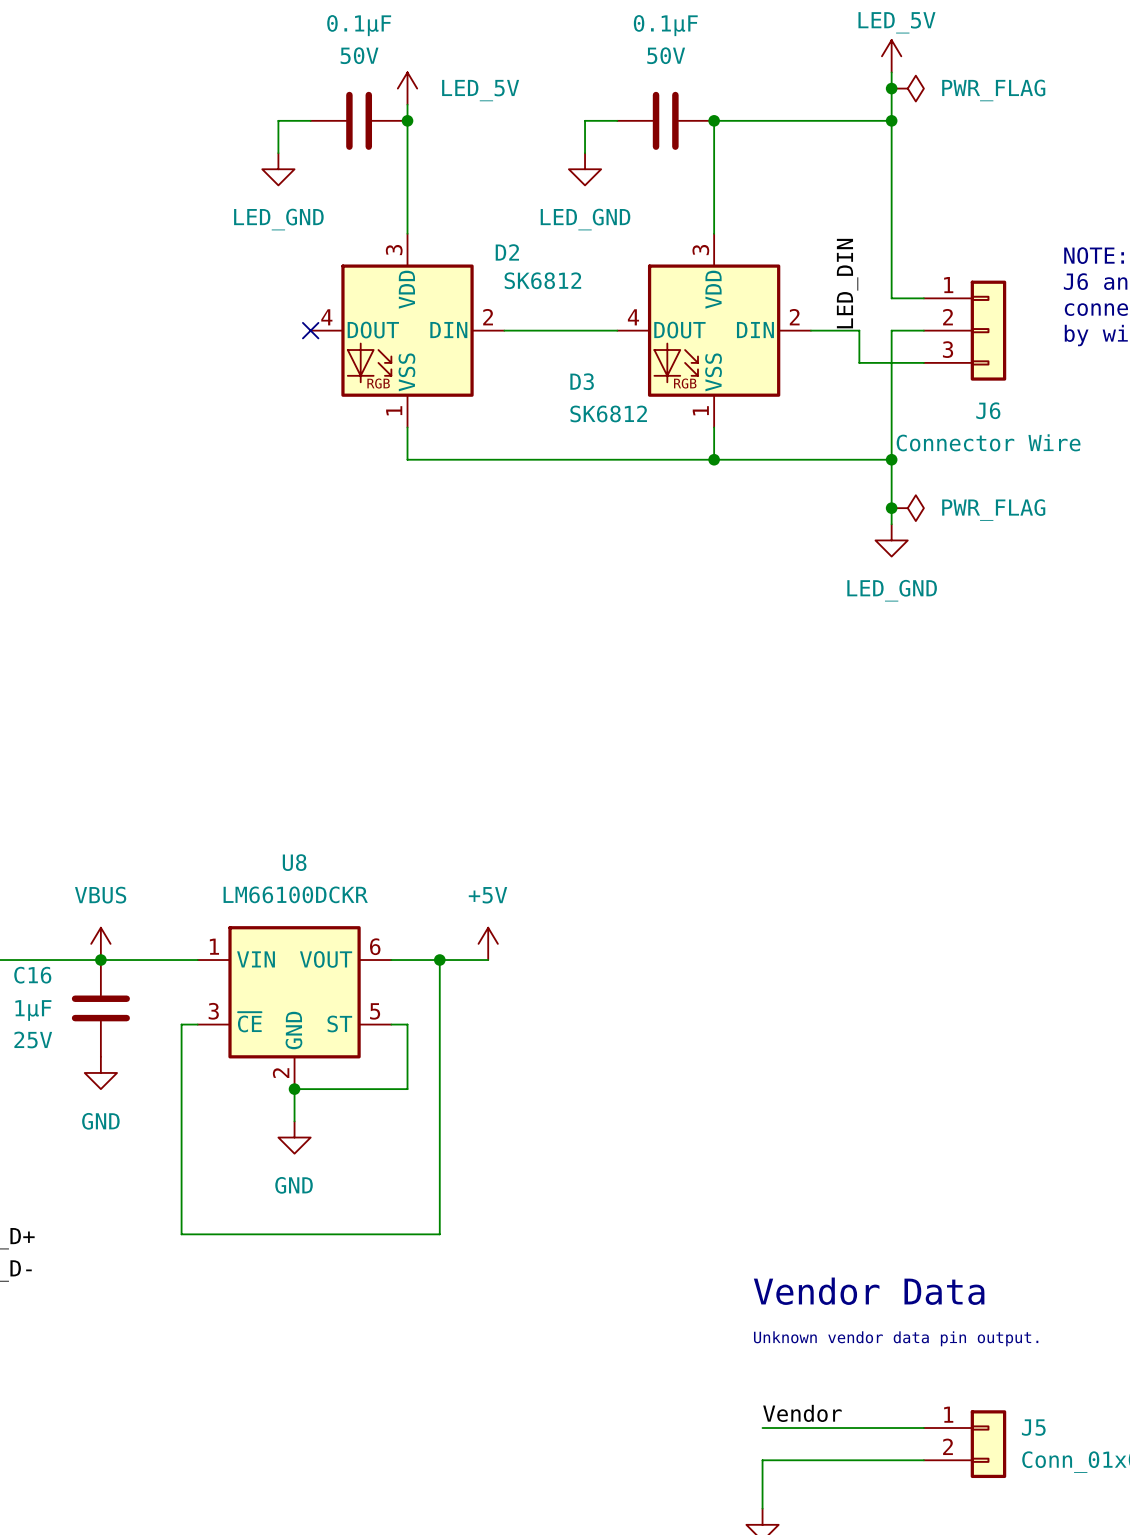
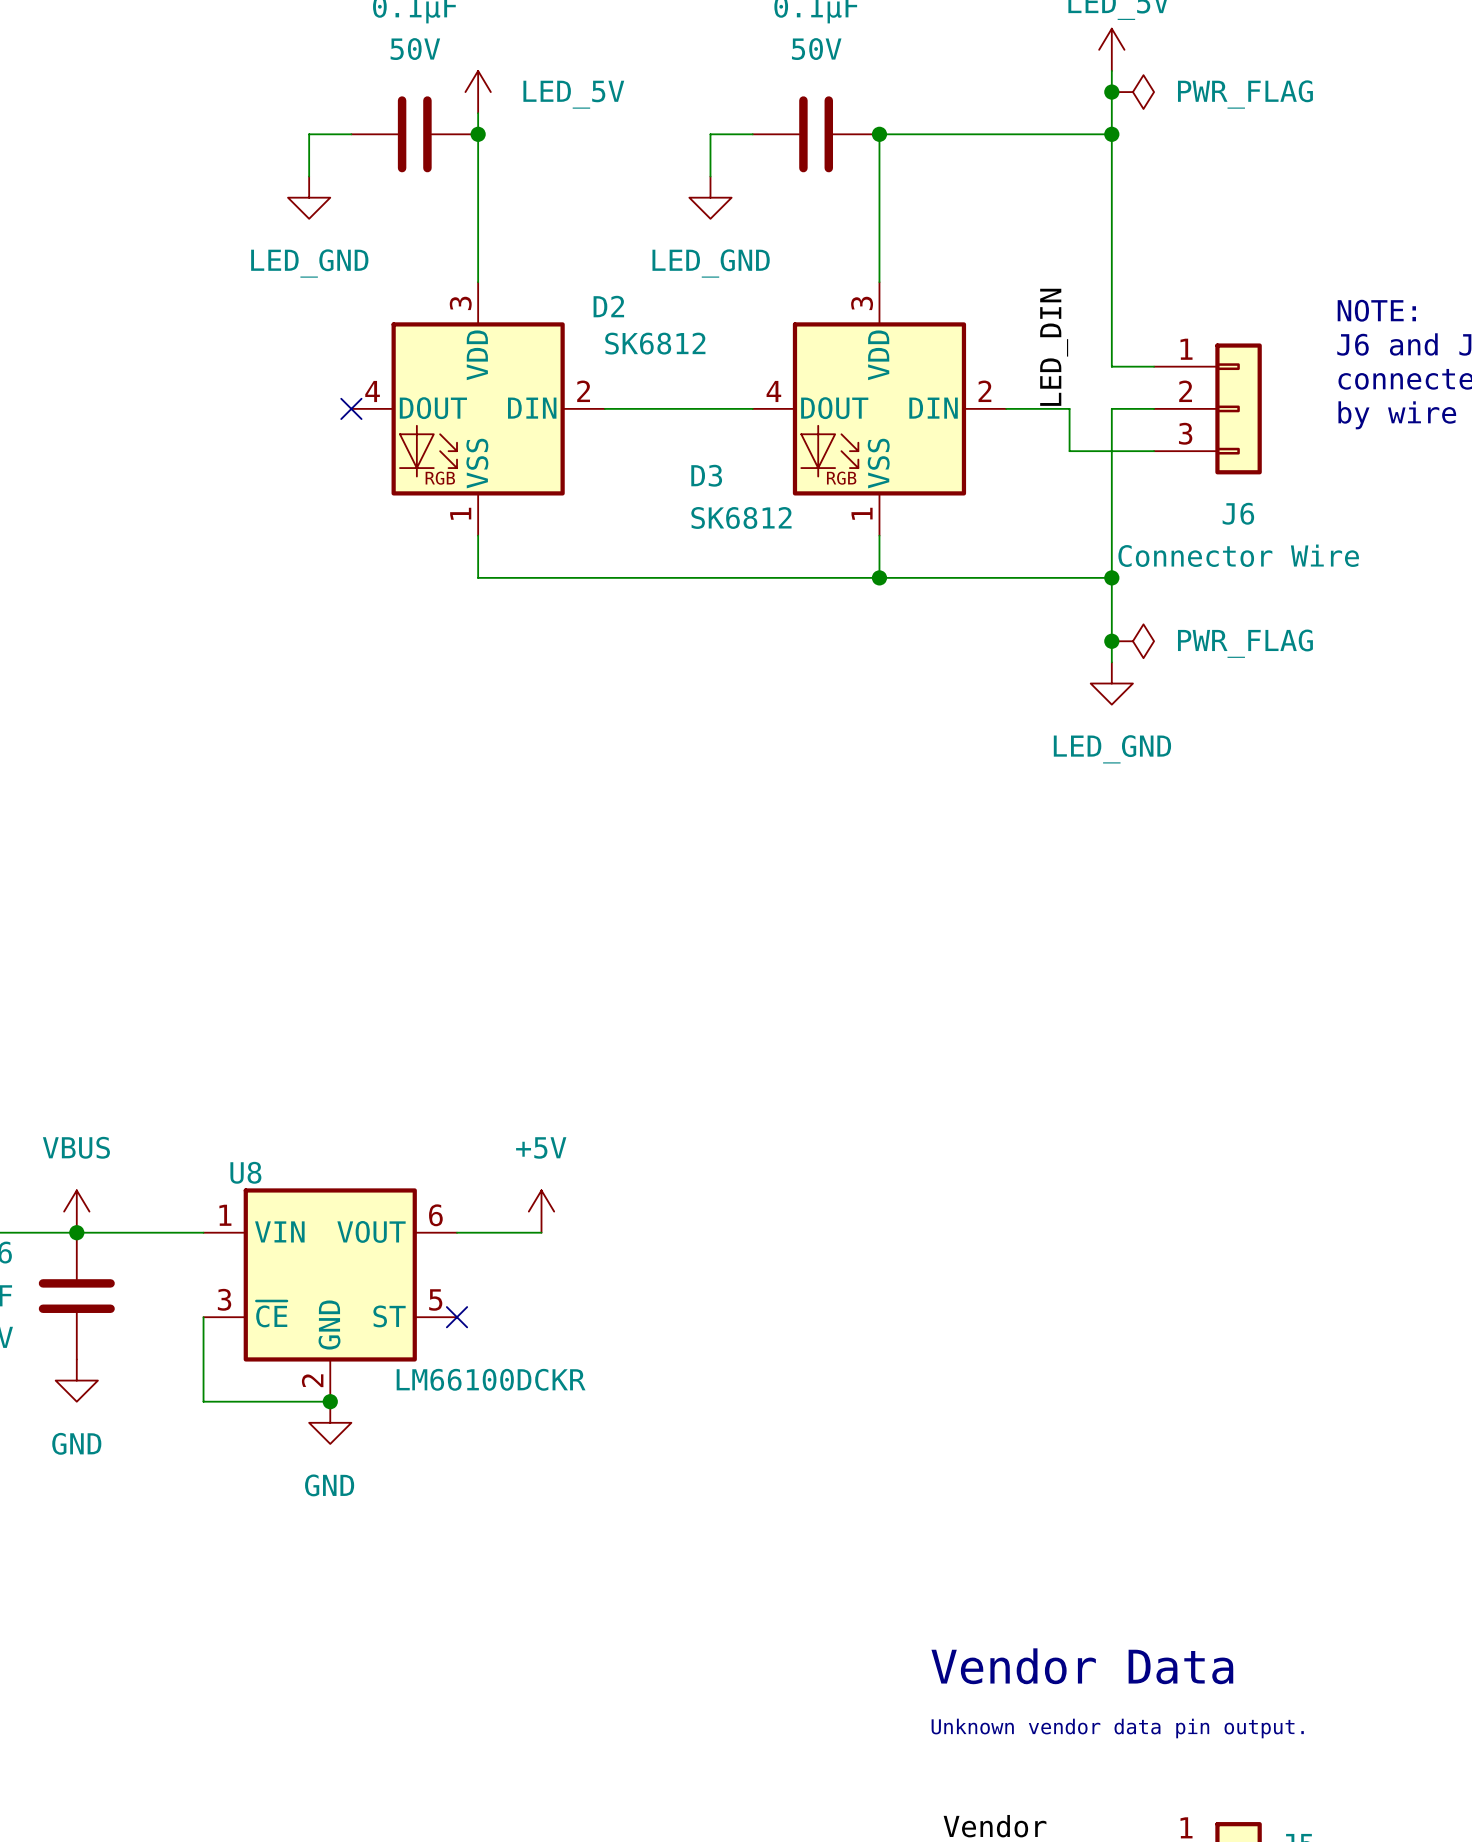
U8 name position: U8 (294, 862) -> U8 (245, 1172)
U8 value position: LM66100DCKR (295, 894) -> LM66100DCKR (491, 1379)
power symbol position: +5V (488, 943) -> +5V (541, 1211)
wire: (439, 960) (439, 1234) (181, 1234) (181, 1024) (197, 1024) -> (330, 1401) (203, 1401) (203, 1317)
junction: (439, 960) -> none
wire: (455, 960) (488, 960) -> none
wire: (391, 1024) (407, 1024) (407, 1089) (294, 1089) (294, 1121) -> none
no-connect mark: none -> (457, 1317)
power symbol position: GND (294, 1137) -> GND (330, 1422)

